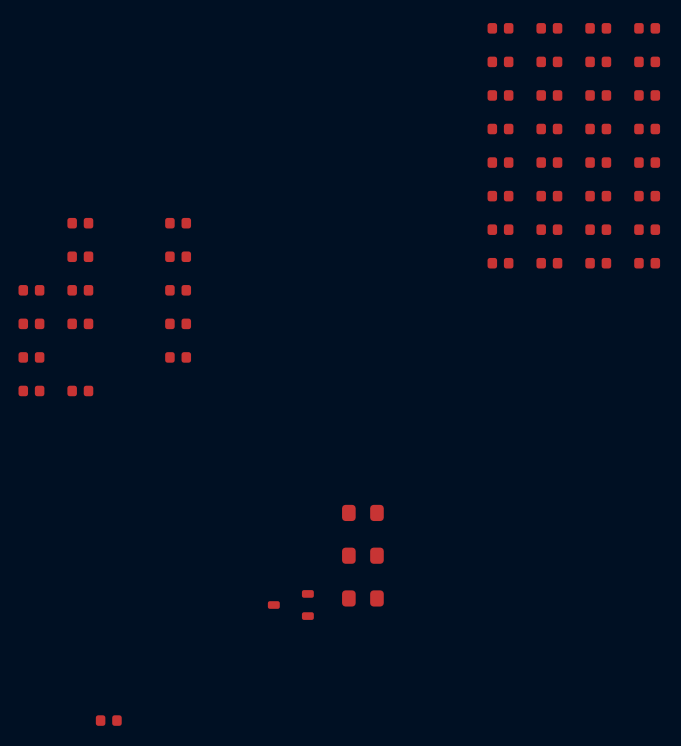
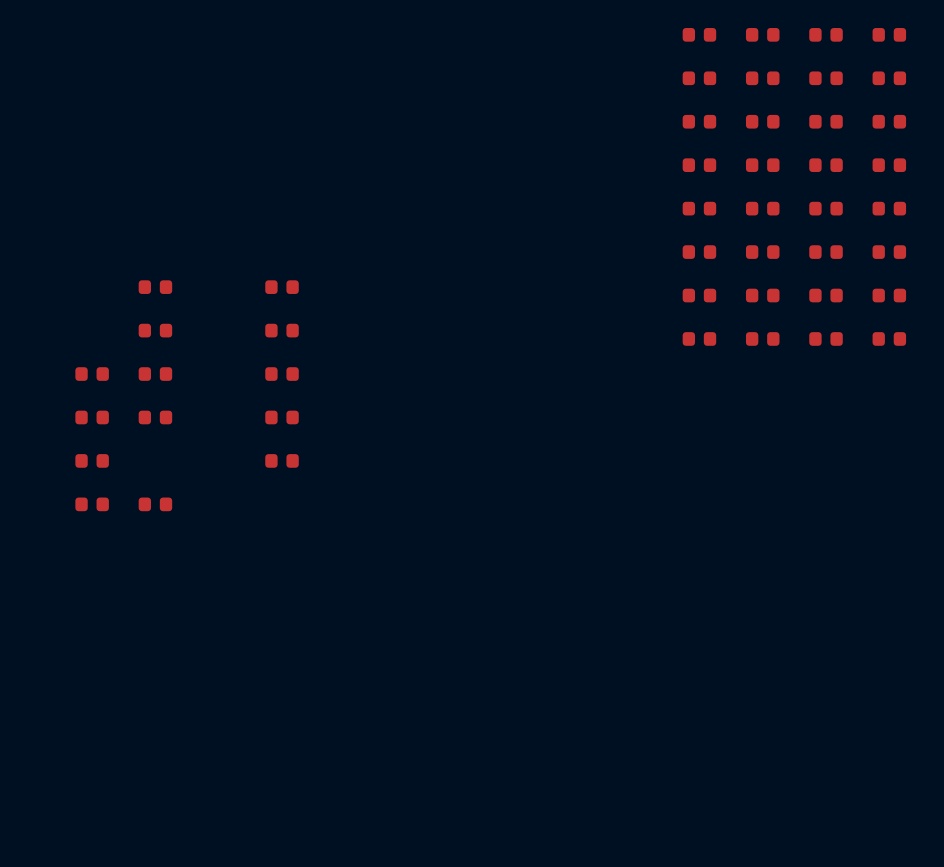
part: (362, 512) -> none
part: (362, 555) -> none
part: (362, 598) -> none
part: (290, 605) -> none

